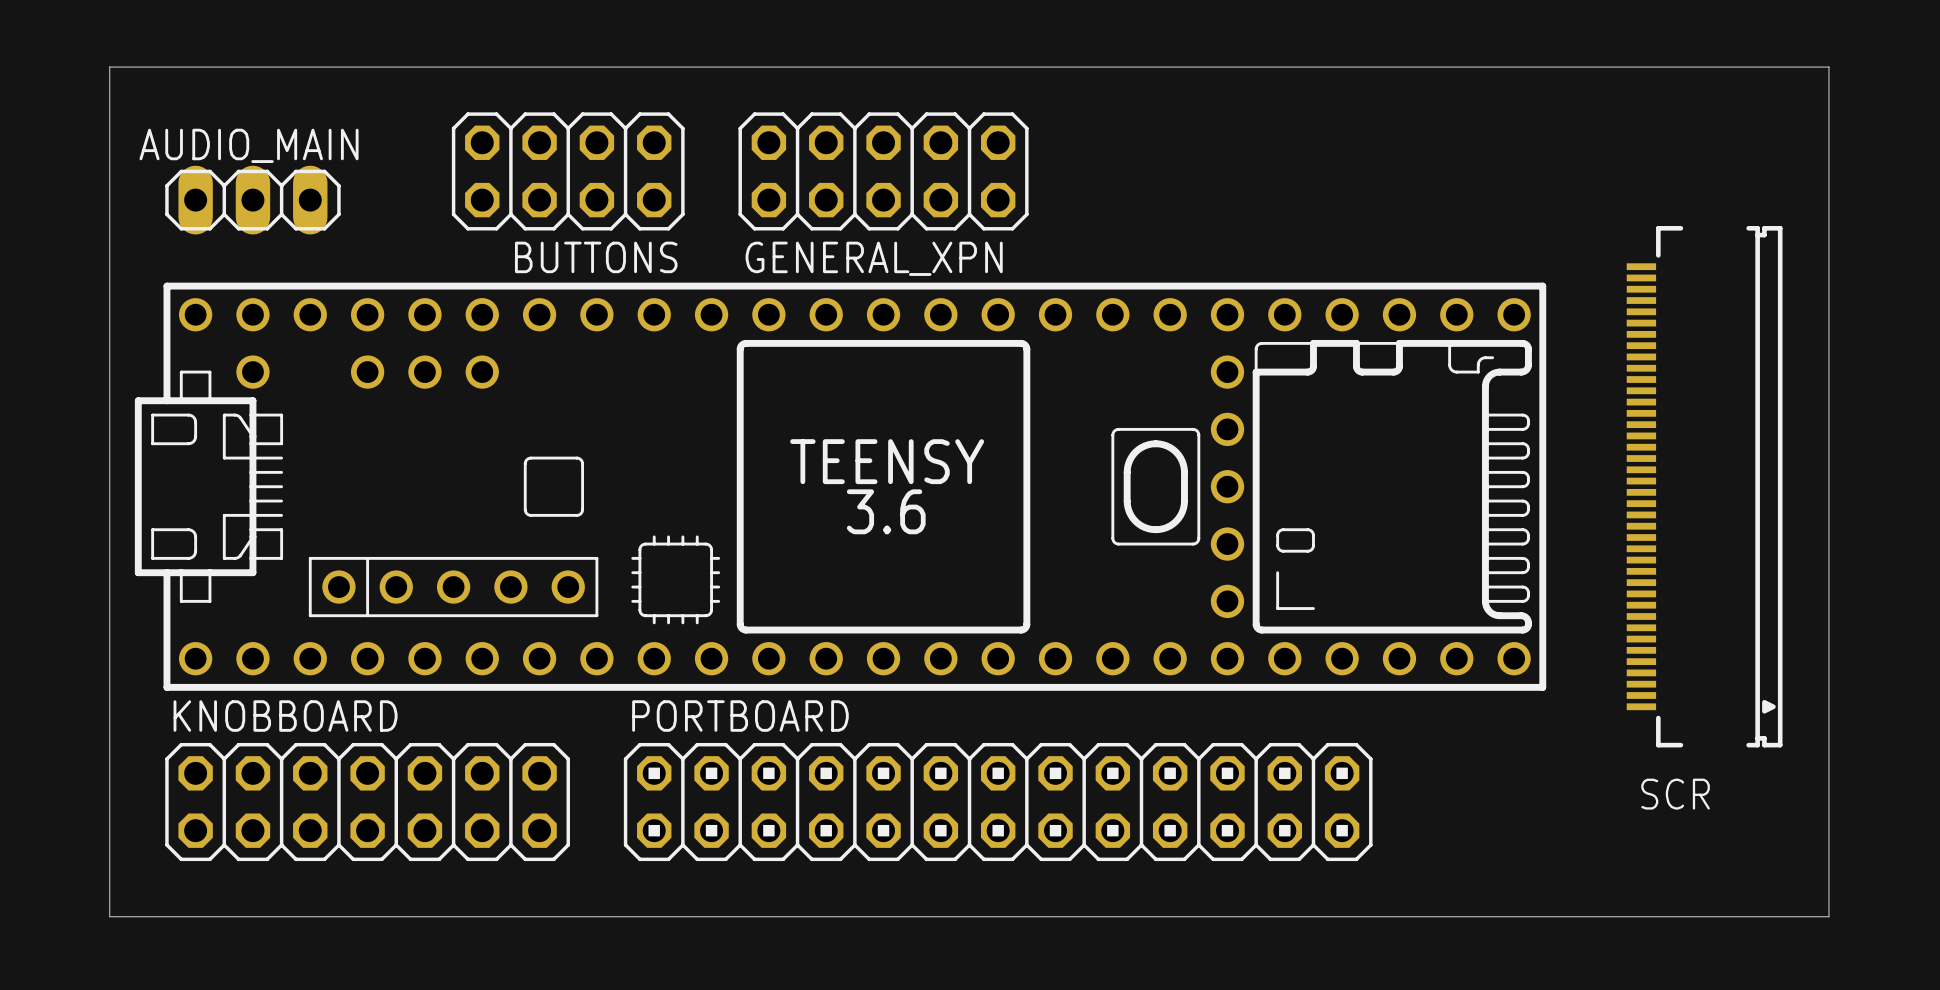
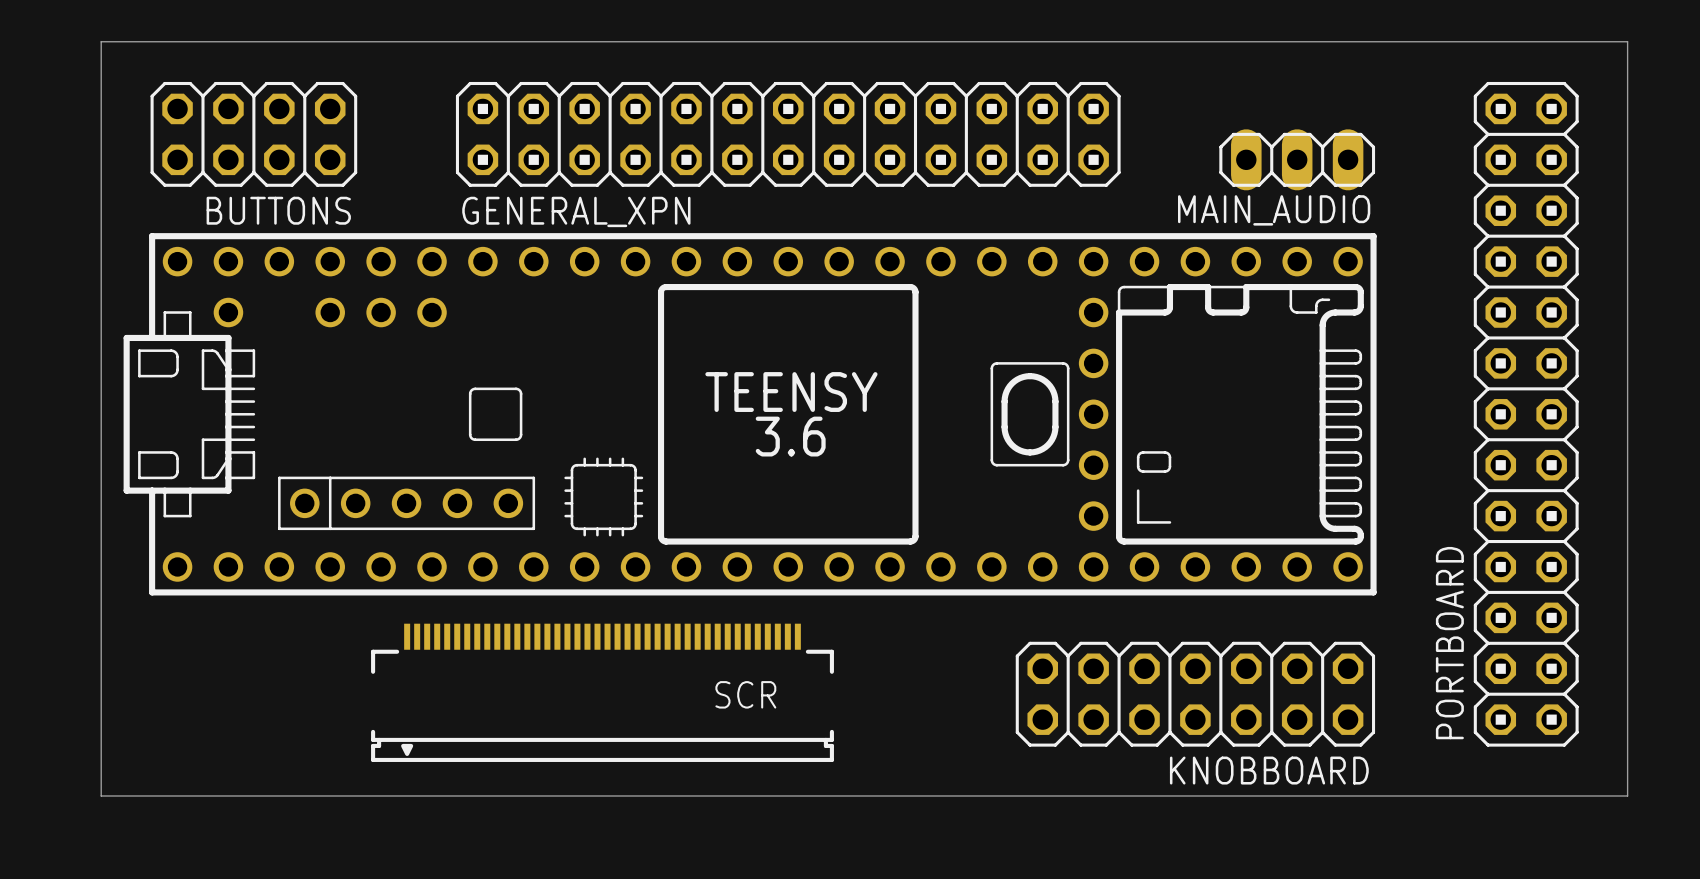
GENERAL_XPN footprint: [738, 112, 1029, 231] -> [455, 81, 1121, 187]
BUTTONS position: (568, 171) -> (253, 134)
AUDIO_MAIN: (252, 200) -> none
MAIN_AUDIO: none -> (1297, 159)
GENERAL_XPN name position: GENERAL_XPN (874, 258) -> GENERAL_XPN (576, 211)
SCR: (1704, 486) -> none
PORTBOARD: none -> (1526, 414)
SCR: none -> (602, 692)
KNOBBOARD: (367, 802) -> none
PORTBOARD: (998, 802) -> none
KNOBBOARD: none -> (1195, 694)

